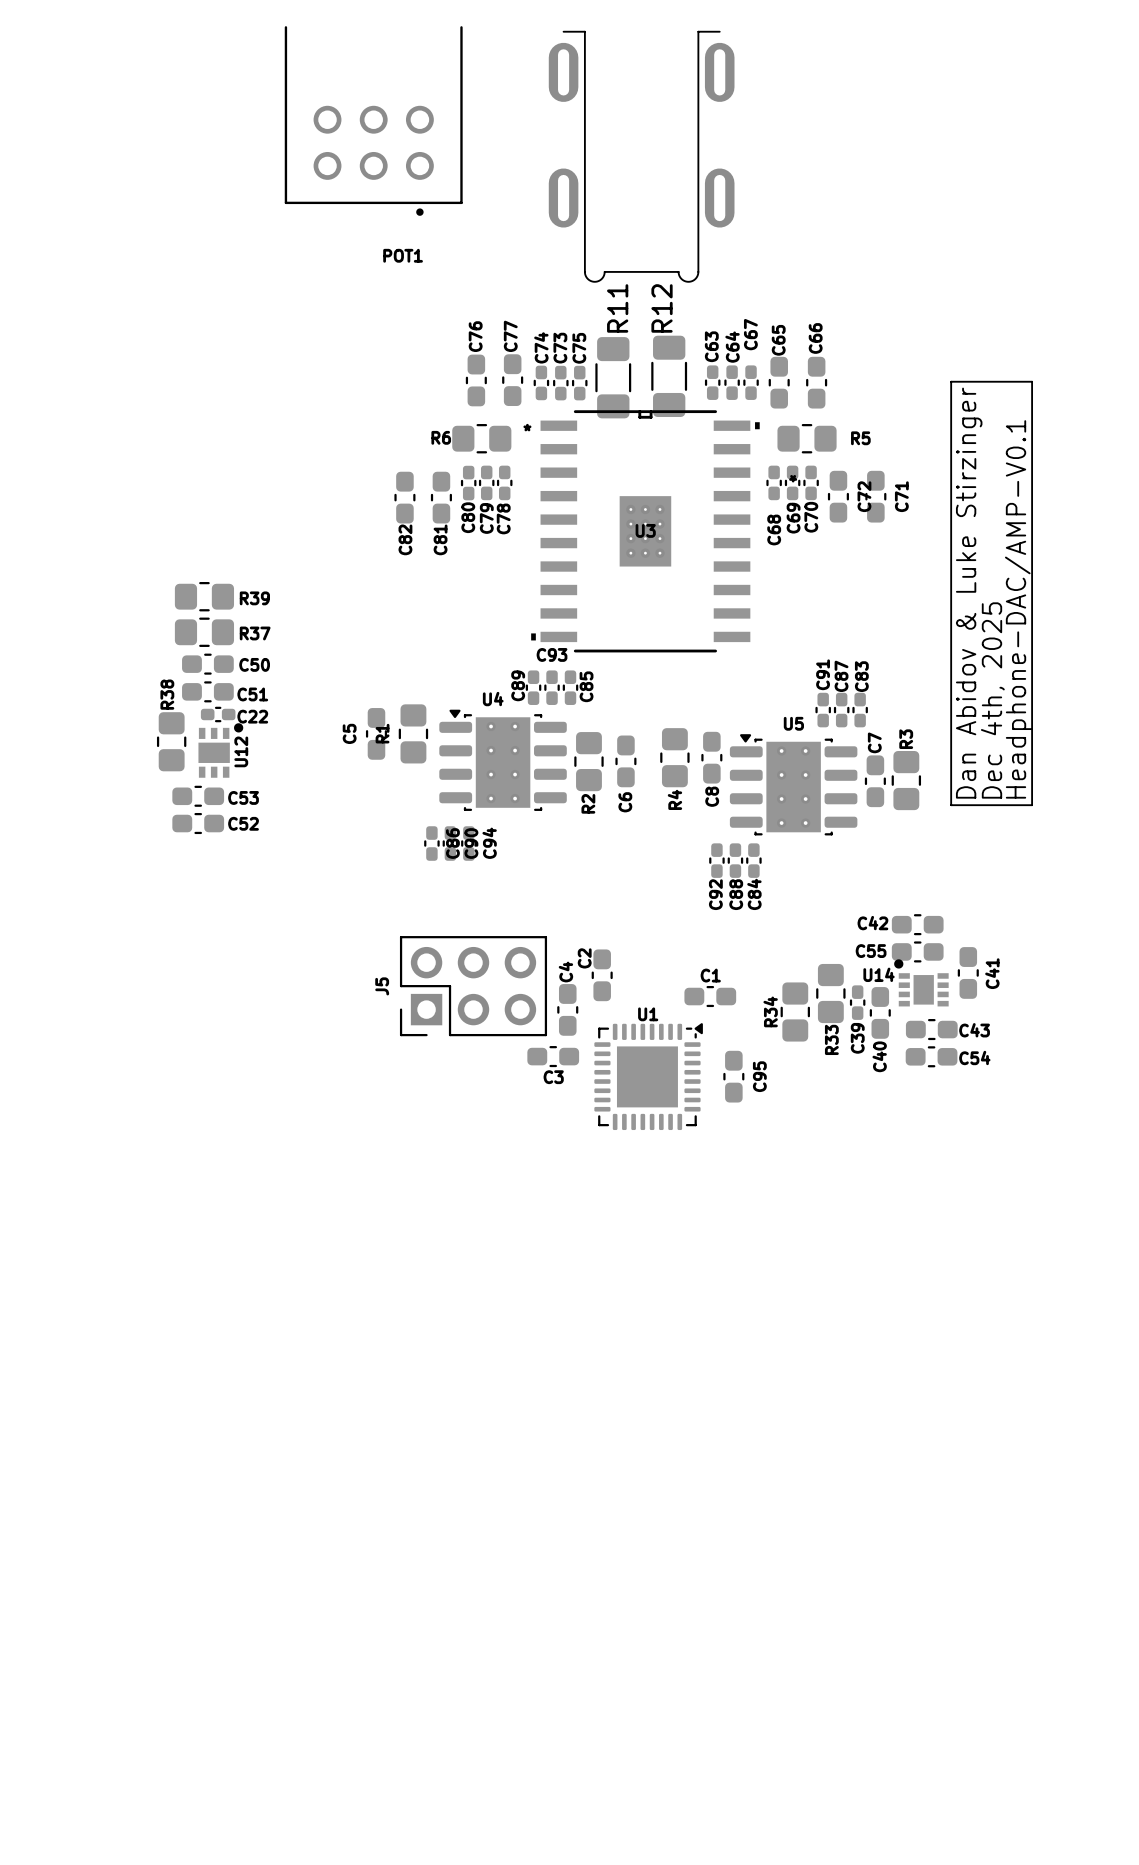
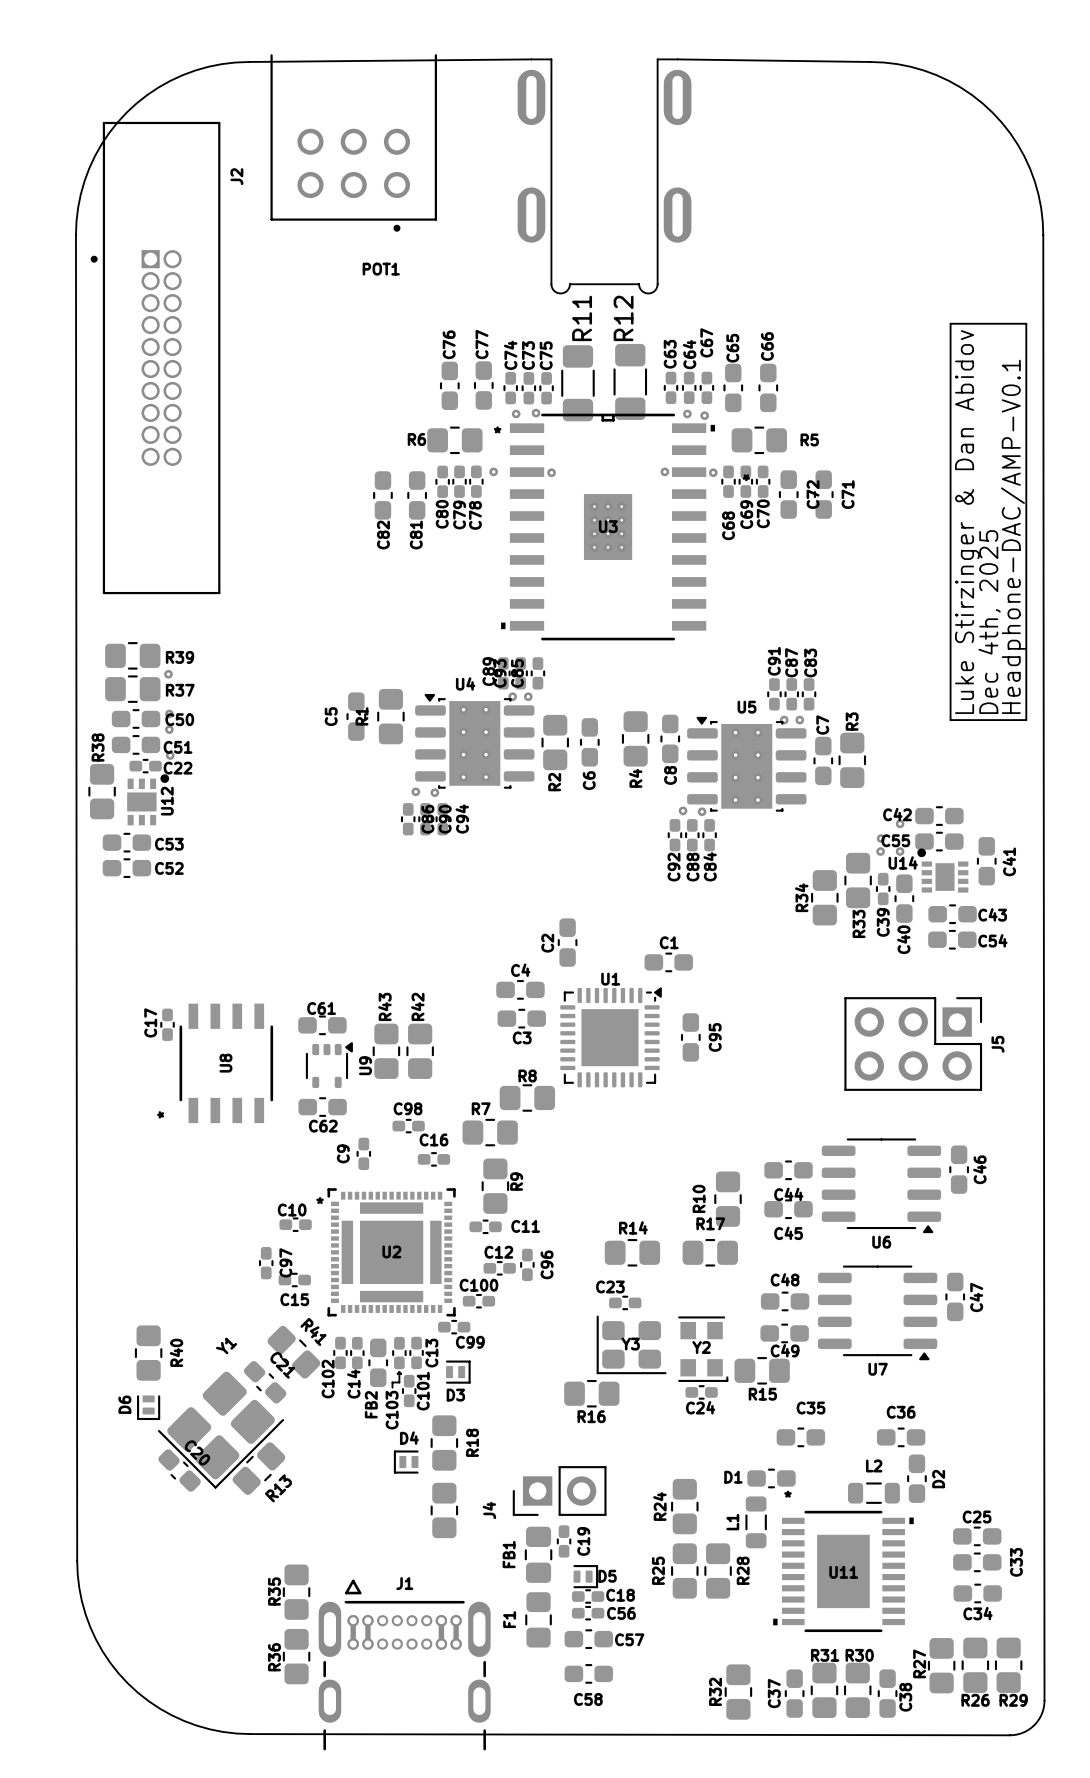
board edge: none -> (531, 59) (248, 61) (208, 66) (182, 75) (158, 87) (126, 112) (101, 144) (84, 181) (78, 207) (75, 234) (77, 1561) (79, 1588) (85, 1614) (102, 1651) (118, 1673) (137, 1692) (171, 1715) (196, 1725) (223, 1731) (250, 1734) (1017, 1734) (1028, 1730) (1036, 1722) (1042, 1712) (1044, 1700) (1043, 234) (1038, 194) (1024, 156) (1001, 122) (971, 95) (936, 75) (910, 66) (883, 62) (677, 59)
J2: none -> (155, 358)
line: (951, 381) (1032, 381) (1032, 805) (951, 805) (951, 381) -> (950, 323) (1026, 323) (1026, 720) (950, 720) (950, 323)
part: none -> (536, 413)
part: none -> (516, 413)
part: none -> (687, 413)
part: none -> (704, 415)
part: none -> (493, 471)
part: none -> (664, 471)
part: none -> (551, 472)
part: none -> (713, 472)
text: none -> Luke Stirzinger & Dan Abidov (967, 522)
text: Dan Abidov & Luke Stirzinger (969, 593) -> none
R39 position: (204, 596) -> (132, 655)
text position: Headphone-DAC/AMP-V0.1 (1018, 609) -> Headphone-DAC/AMP-V0.1 (1013, 536)
R37 position: (204, 632) -> (132, 689)
C93 name rotation: 0° (552, 654) -> 90° counterclockwise (500, 673)
C50 position: (207, 664) -> (136, 718)
C85 name position: C85 (586, 686) -> C85 (517, 673)
part: none -> (168, 674)
C51 position: (207, 691) -> (136, 744)
text position: Dec 4th, 2025 (992, 700) -> Dec 4th, 2025 (989, 622)
part: none -> (512, 696)
part: none -> (528, 696)
C22 position: (218, 714) -> (145, 766)
part: none -> (169, 714)
part: none -> (784, 720)
part: none -> (799, 720)
R38 position: (171, 741) -> (102, 791)
part: none -> (169, 729)
U12 position: (220, 750) -> (148, 799)
part: none -> (170, 755)
C53 position: (198, 796) -> (126, 842)
part: none -> (415, 791)
part: none -> (434, 792)
C52 position: (198, 823) -> (126, 868)
part: none -> (683, 810)
part: none -> (702, 811)
part: none -> (900, 823)
part: none -> (881, 838)
part: none -> (880, 851)
part: none -> (900, 851)
C42 position: (917, 924) -> (939, 816)
C55 position: (917, 951) -> (939, 841)
C2 name position: C2 (584, 958) -> C2 (547, 943)
C41 position: (968, 972) -> (986, 861)
U14 position: (921, 982) -> (942, 870)
J5 rotation: 0° (473, 986) -> 180° (913, 1044)
J5 position: (473, 986) -> (913, 1044)
R33 position: (830, 993) -> (858, 880)
C39 position: (857, 1002) -> (883, 889)
C4 rotation: 0° (567, 1009) -> 90° clockwise (520, 989)
R34 position: (795, 1011) -> (824, 897)
C40 position: (880, 1012) -> (904, 898)
C43 position: (931, 1029) -> (952, 914)
C54 position: (931, 1056) -> (952, 939)
C17: none -> (167, 1024)
C61: none -> (322, 1025)
R43: none -> (386, 1051)
R42: none -> (420, 1051)
U8: none -> (226, 1063)
U9: none -> (329, 1065)
R8: none -> (527, 1097)
C62: none -> (322, 1107)
C98: none -> (408, 1126)
R7: none -> (490, 1132)
C9: none -> (363, 1153)
C16: none -> (433, 1159)
C46: none -> (959, 1169)
C44: none -> (788, 1170)
R9: none -> (495, 1186)
U6: none -> (881, 1185)
R10: none -> (728, 1199)
C45: none -> (788, 1209)
C10: none -> (295, 1224)
C11: none -> (485, 1226)
U2: none -> (391, 1252)
R14: none -> (632, 1252)
R17: none -> (710, 1252)
C97: none -> (266, 1263)
C96: none -> (527, 1264)
C12: none -> (499, 1268)
C15: none -> (294, 1280)
C47: none -> (955, 1296)
C100: none -> (478, 1301)
C48: none -> (785, 1301)
C23: none -> (625, 1302)
U7: none -> (877, 1312)
C99: none -> (454, 1327)
C49: none -> (784, 1333)
Y3: none -> (631, 1344)
Y2: none -> (703, 1349)
R41: none -> (293, 1352)
R40: none -> (148, 1353)
C102: none -> (340, 1352)
C14: none -> (357, 1353)
C103: none -> (399, 1353)
C13: none -> (416, 1352)
FB2: none -> (378, 1362)
R15: none -> (762, 1370)
line: none -> (399, 1372) (399, 1382) (392, 1382) (392, 1387)
line: none -> (399, 1372) (397, 1373) (401, 1373) (399, 1372)
D3: none -> (458, 1372)
C21: none -> (265, 1382)
C101: none -> (409, 1391)
C24: none -> (701, 1392)
R16: none -> (591, 1393)
D6: none -> (148, 1407)
Y1: none -> (221, 1430)
C35: none -> (800, 1437)
C36: none -> (901, 1437)
R18: none -> (444, 1443)
D4: none -> (406, 1462)
R13: none -> (258, 1468)
C20: none -> (179, 1470)
D1: none -> (771, 1478)
D2: none -> (916, 1478)
J4: none -> (559, 1491)
L2: none -> (873, 1493)
R24: none -> (684, 1506)
part: none -> (444, 1510)
L1: none -> (756, 1522)
C25: none -> (977, 1536)
C19: none -> (564, 1541)
FB1: none -> (538, 1554)
C33: none -> (977, 1562)
R28: none -> (684, 1571)
R25: none -> (718, 1571)
U11: none -> (843, 1571)
D5: none -> (585, 1576)
R35: none -> (296, 1592)
C34: none -> (977, 1593)
C18: none -> (588, 1596)
C56: none -> (588, 1613)
F1: none -> (538, 1619)
C57: none -> (588, 1639)
R36: none -> (296, 1656)
J1: none -> (404, 1665)
R27: none -> (941, 1665)
R26: none -> (975, 1665)
R29: none -> (1008, 1665)
C58: none -> (588, 1673)
R31: none -> (824, 1690)
R30: none -> (857, 1690)
R32: none -> (738, 1692)
C37: none -> (794, 1693)
C38: none -> (887, 1693)

